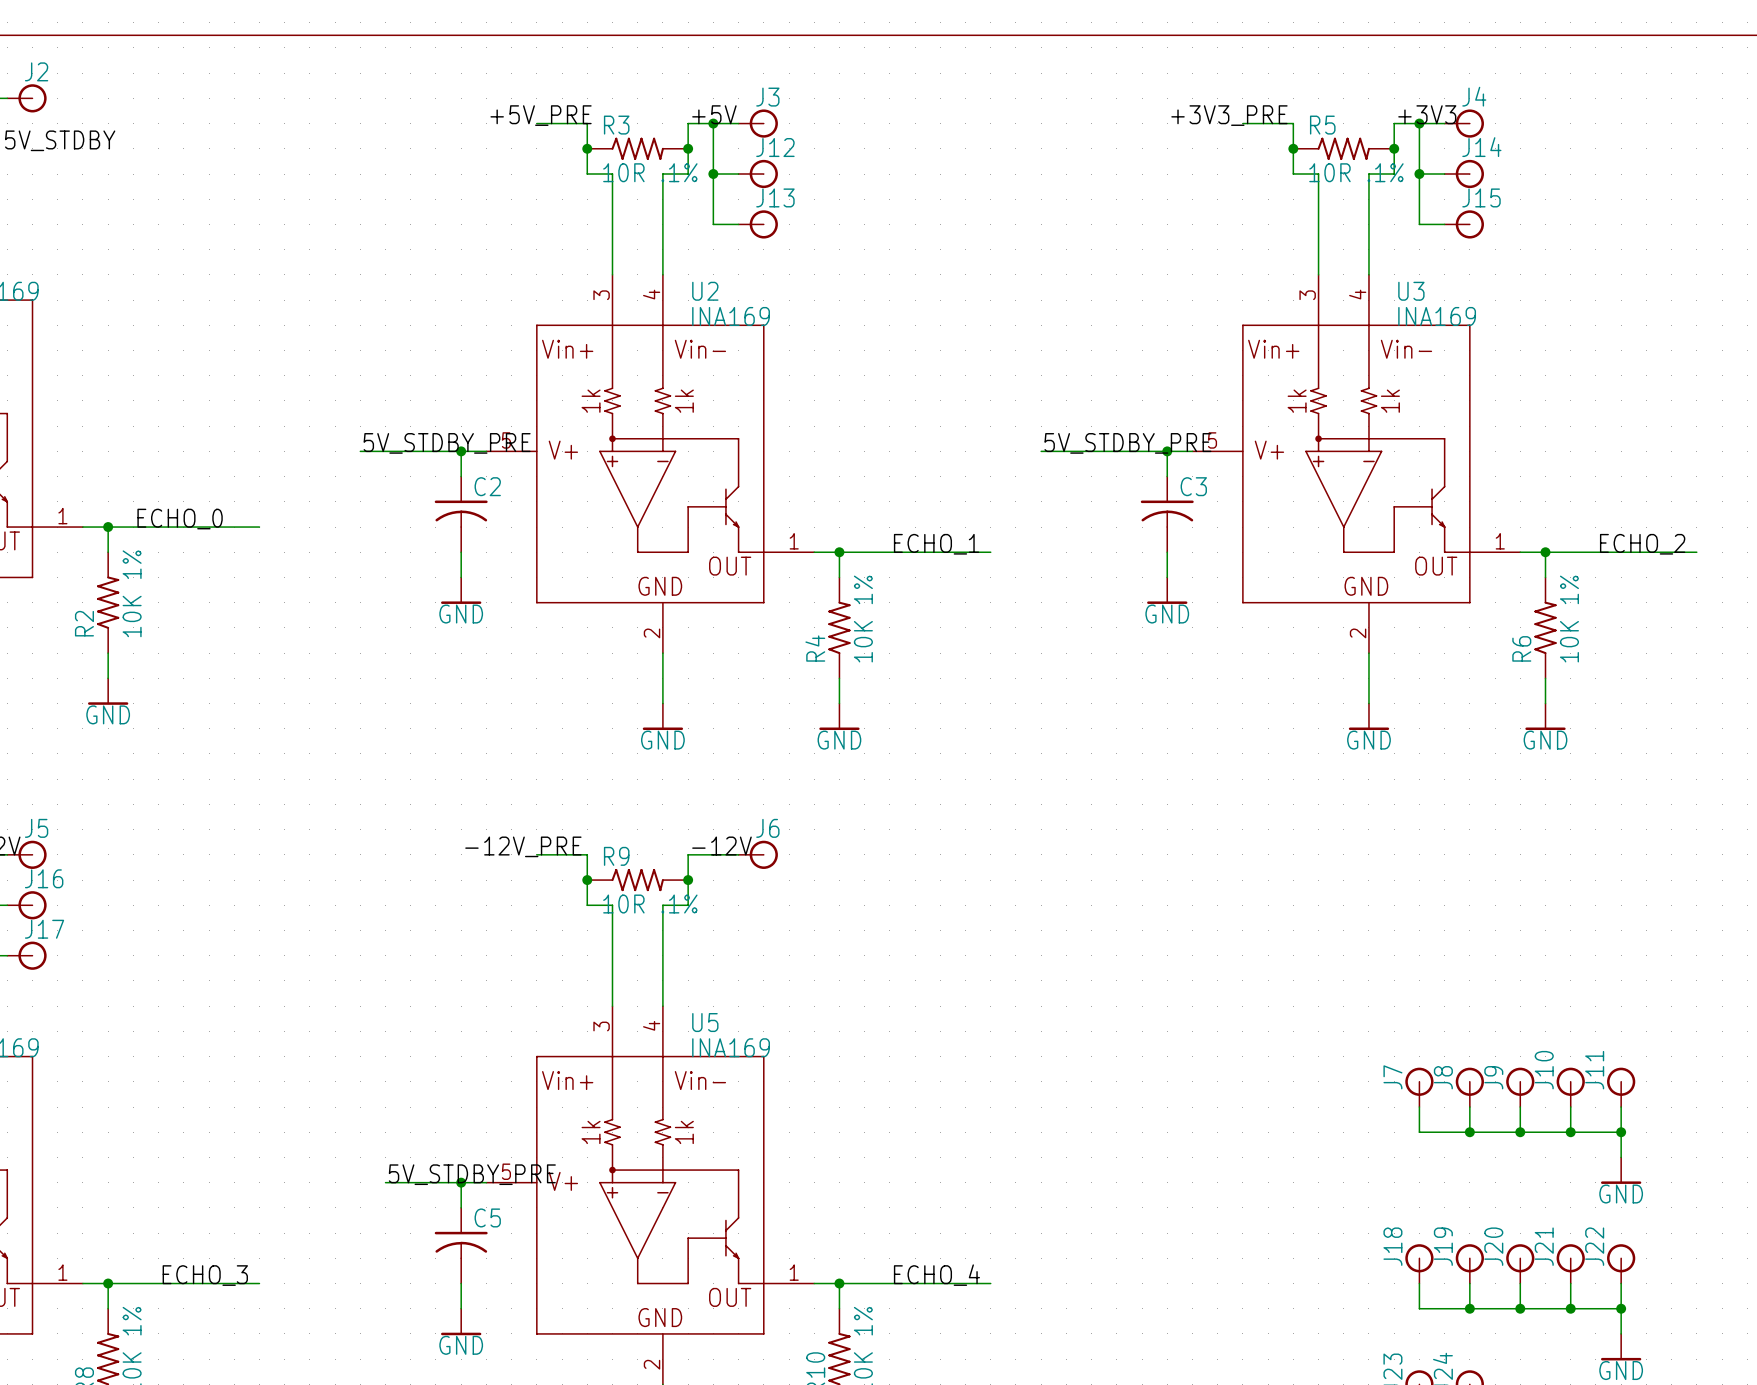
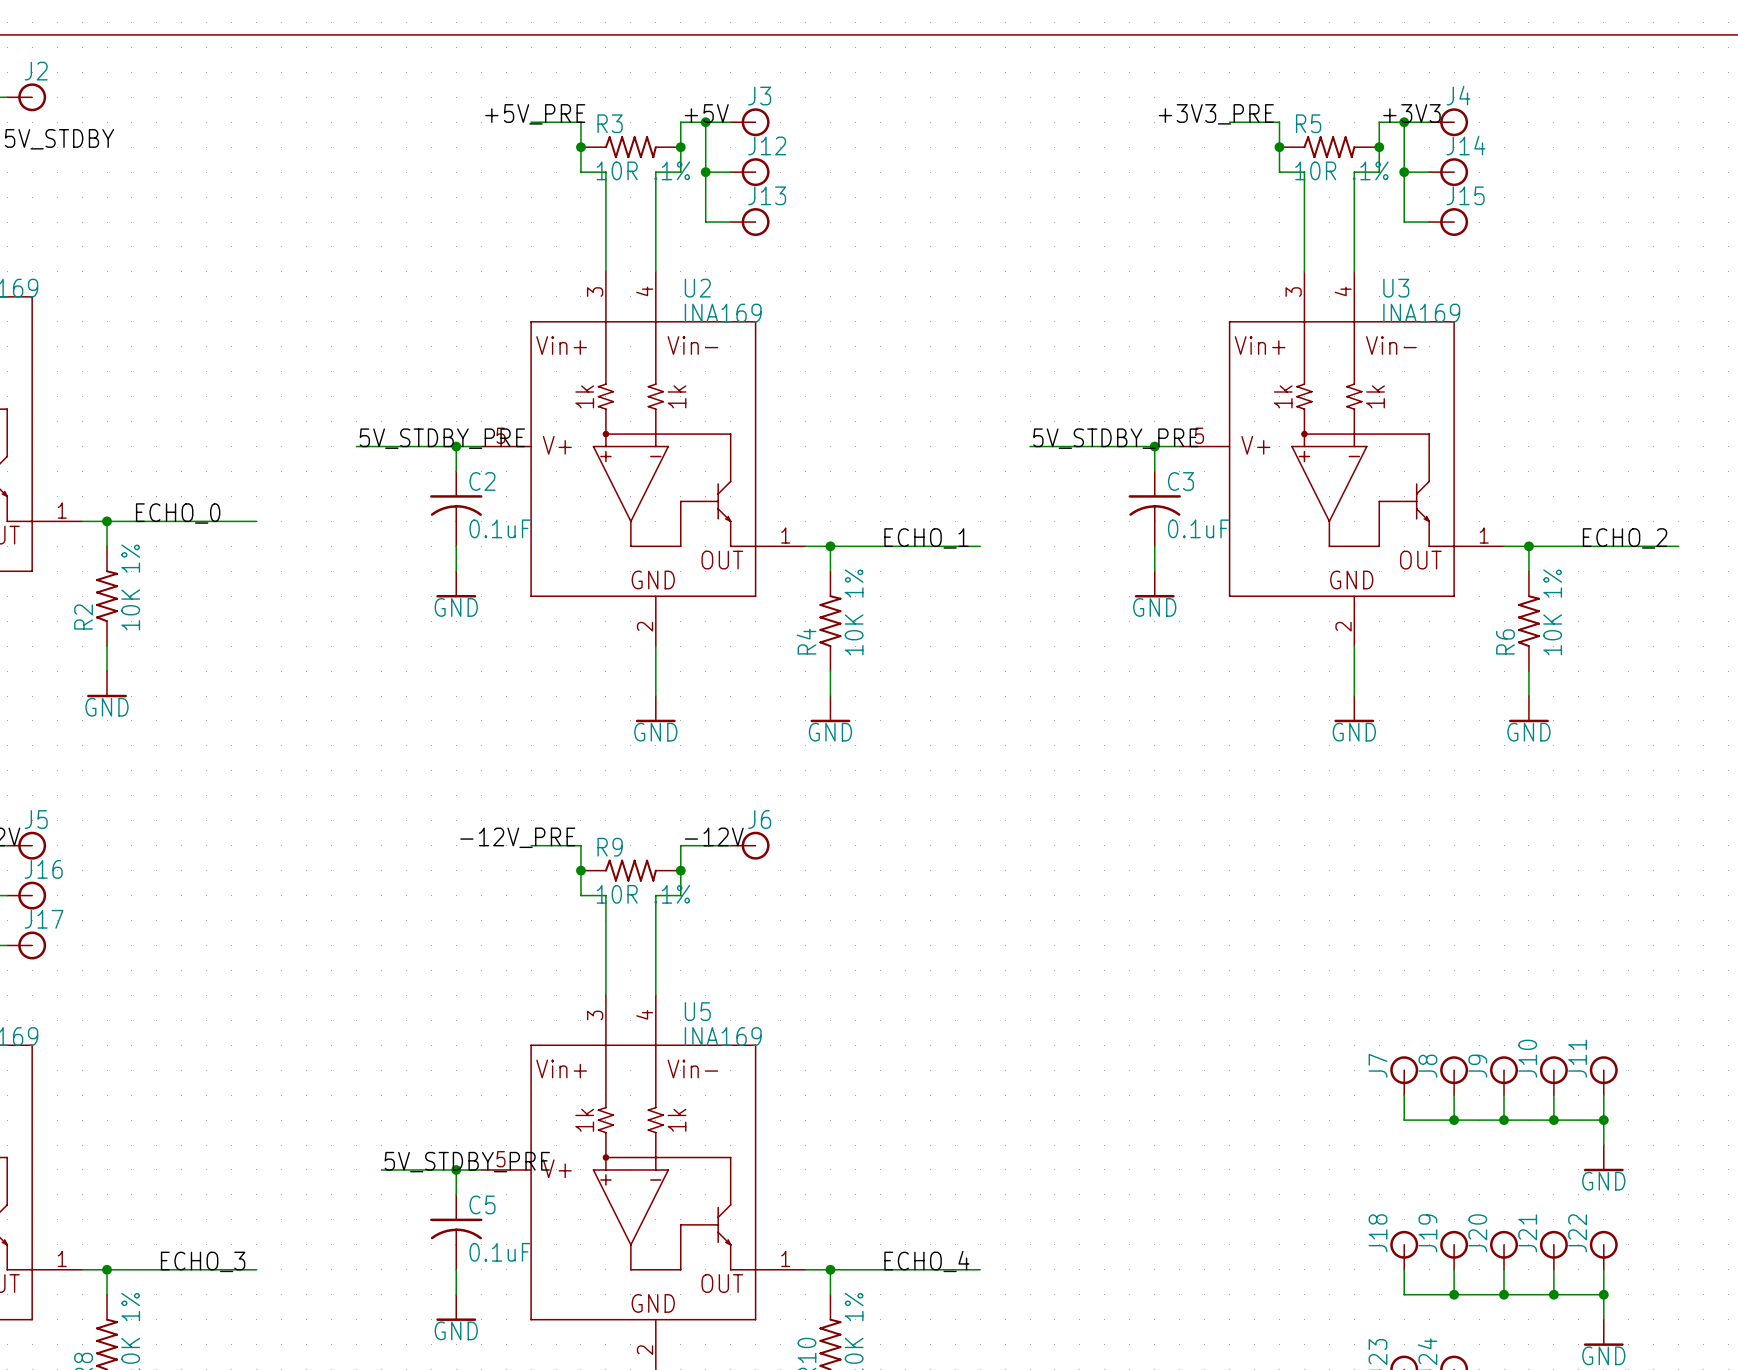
C2 value: none -> 0.1uF (500, 528)
C3 value: none -> 0.1uF (1198, 528)
C5 value: none -> 0.1uF (500, 1252)

